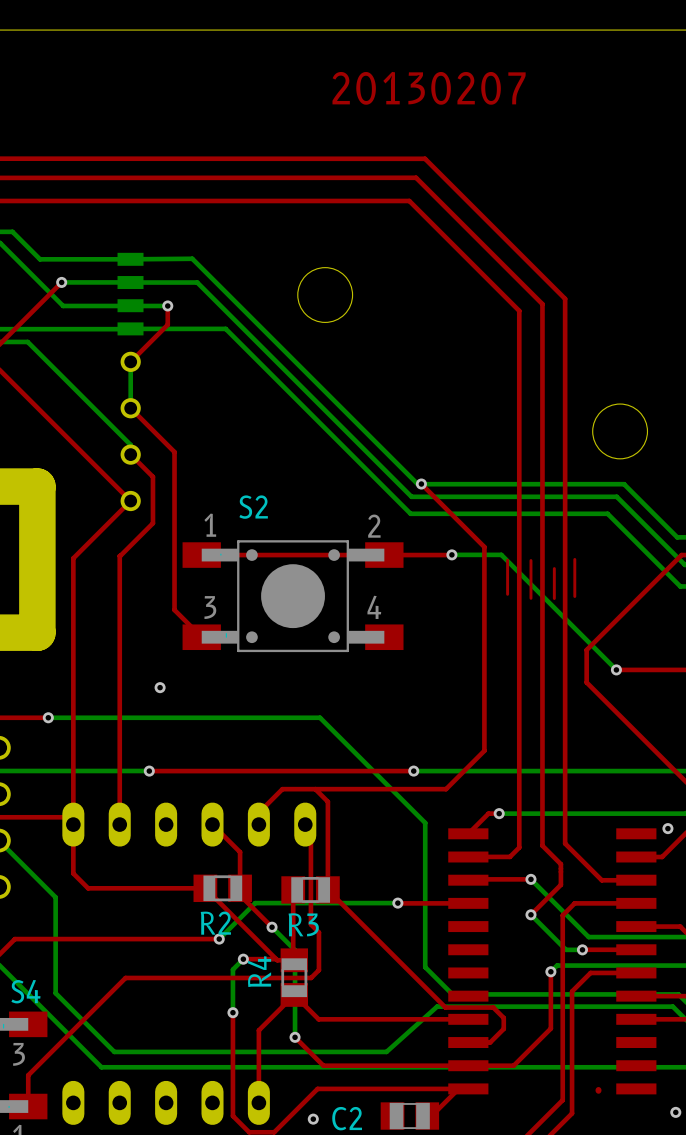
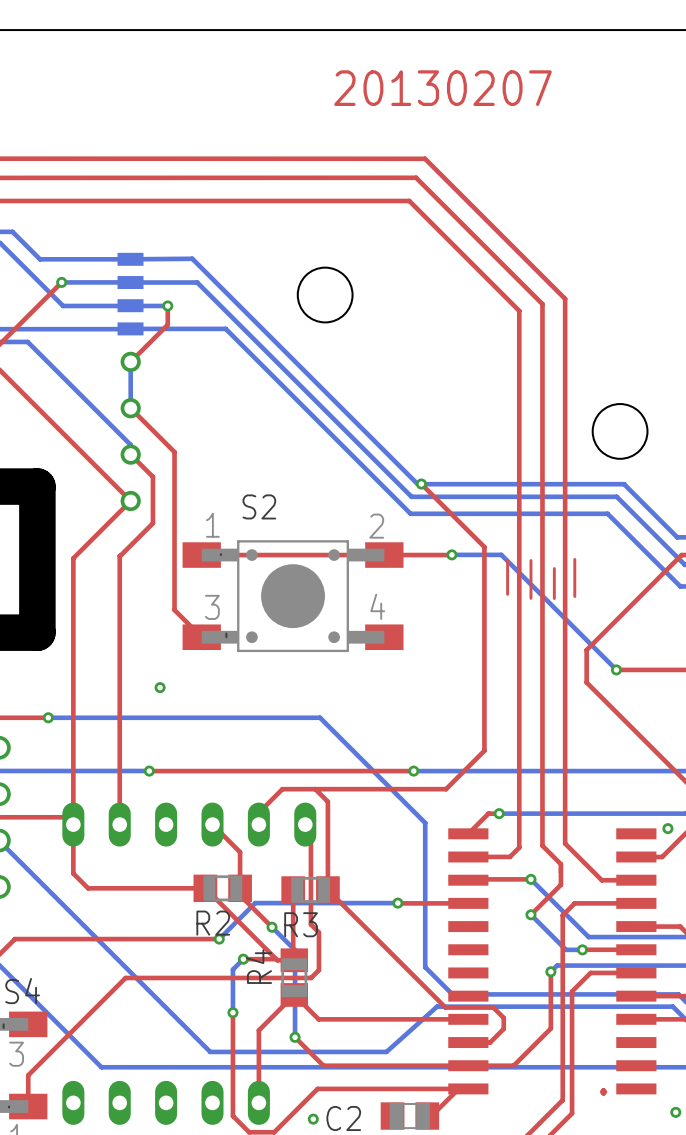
bottom track: (55, 897) (55, 993) (114, 1051) (210, 1051) -> (55, 897) (210, 1051)

